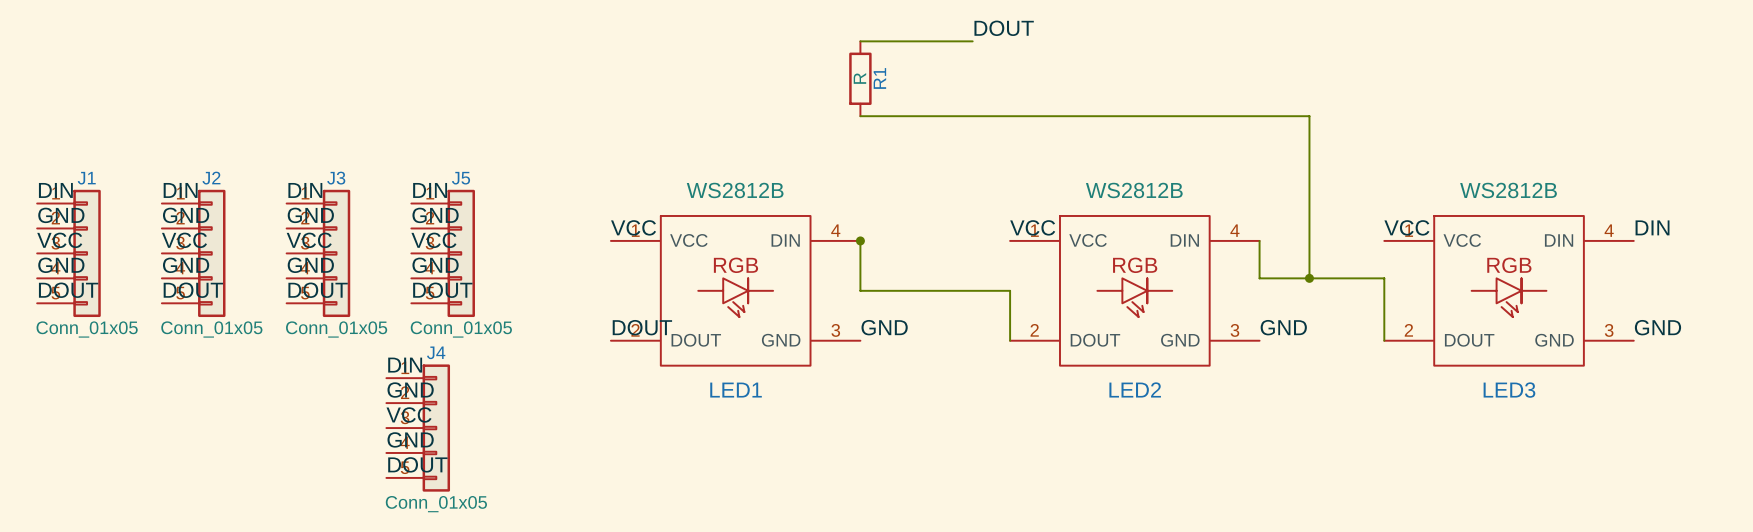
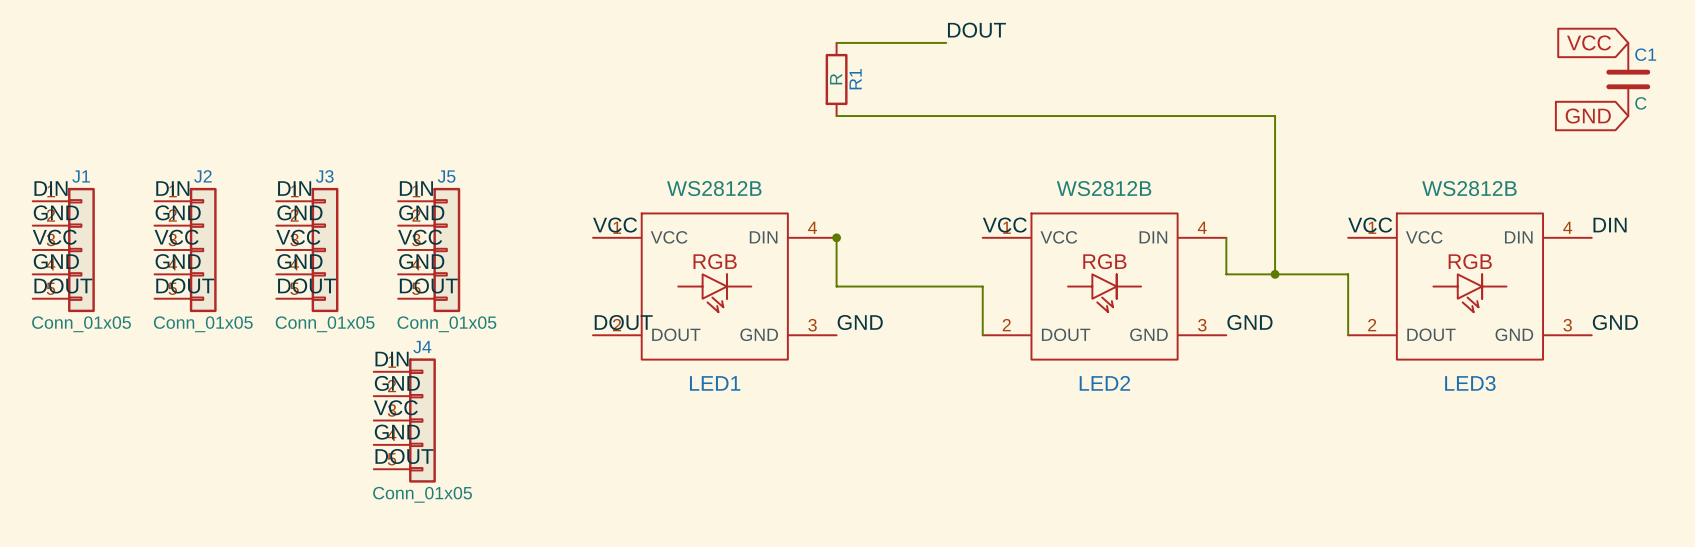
global label: none -> VCC (1589, 42)
C1: none -> C (1628, 79)
global label: none -> GND (1588, 116)

